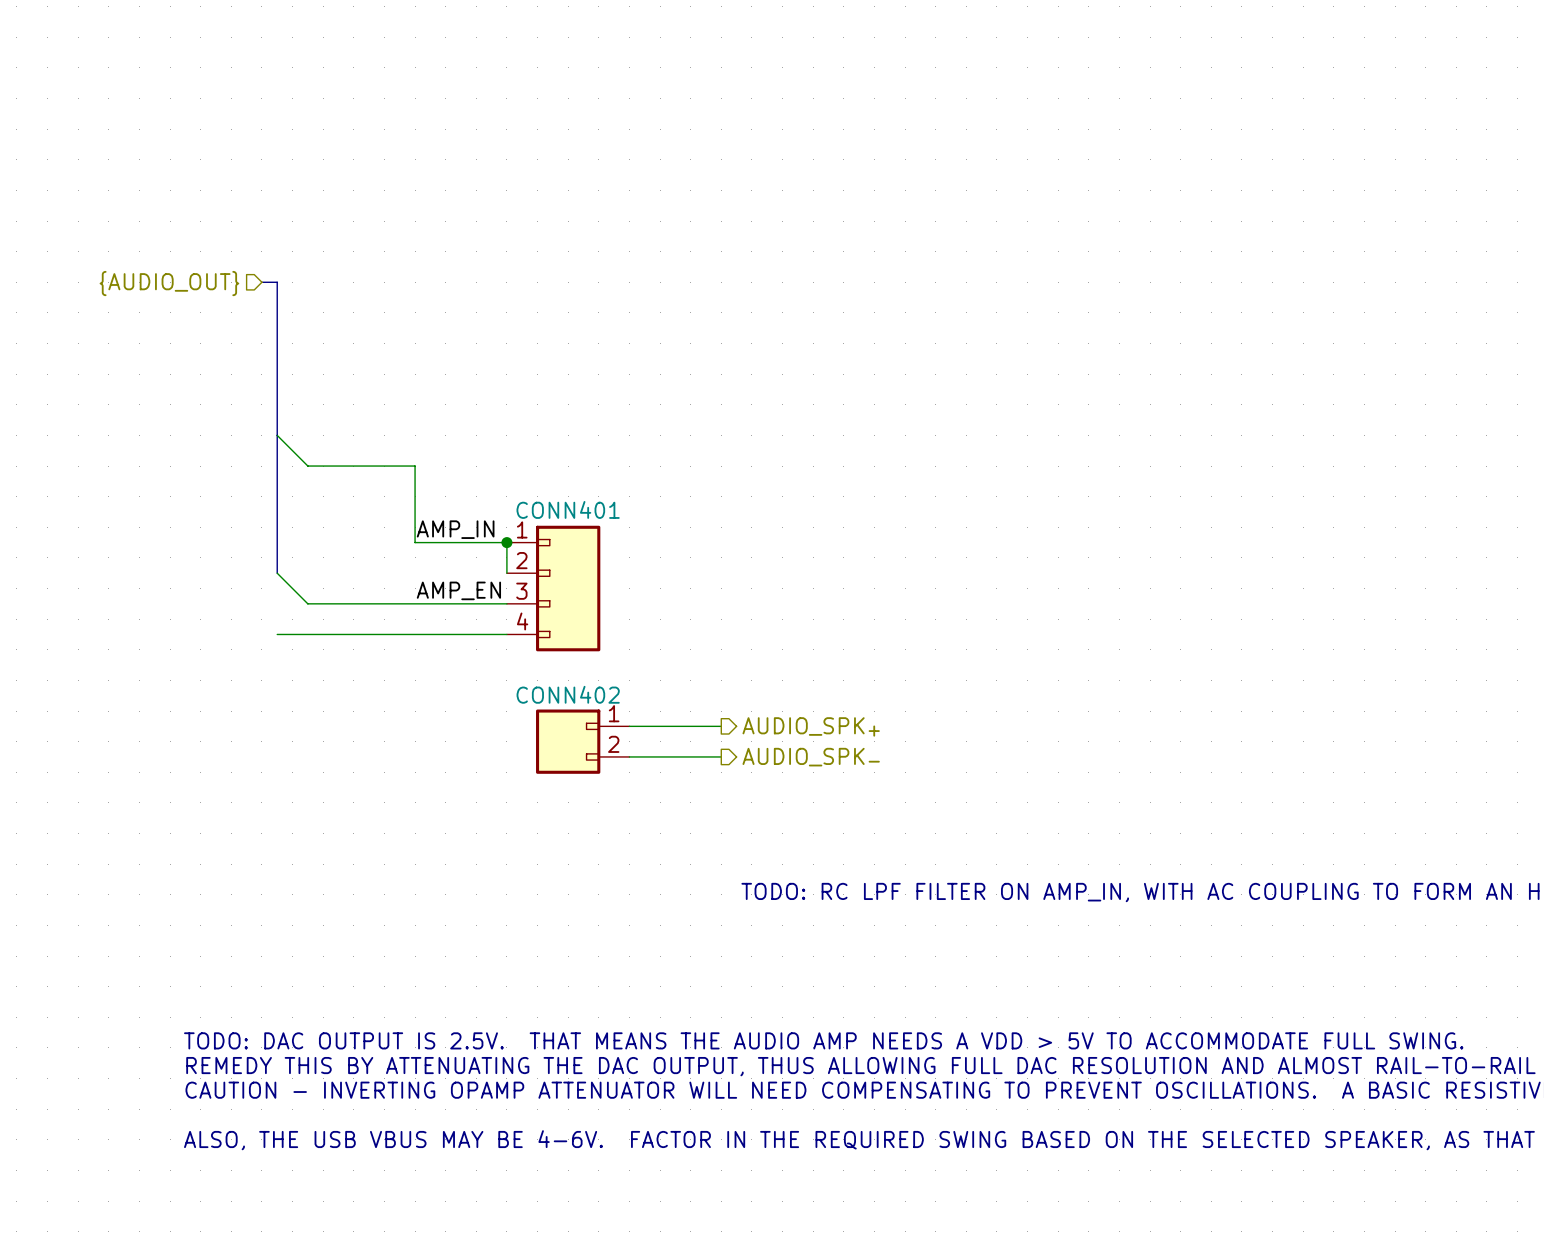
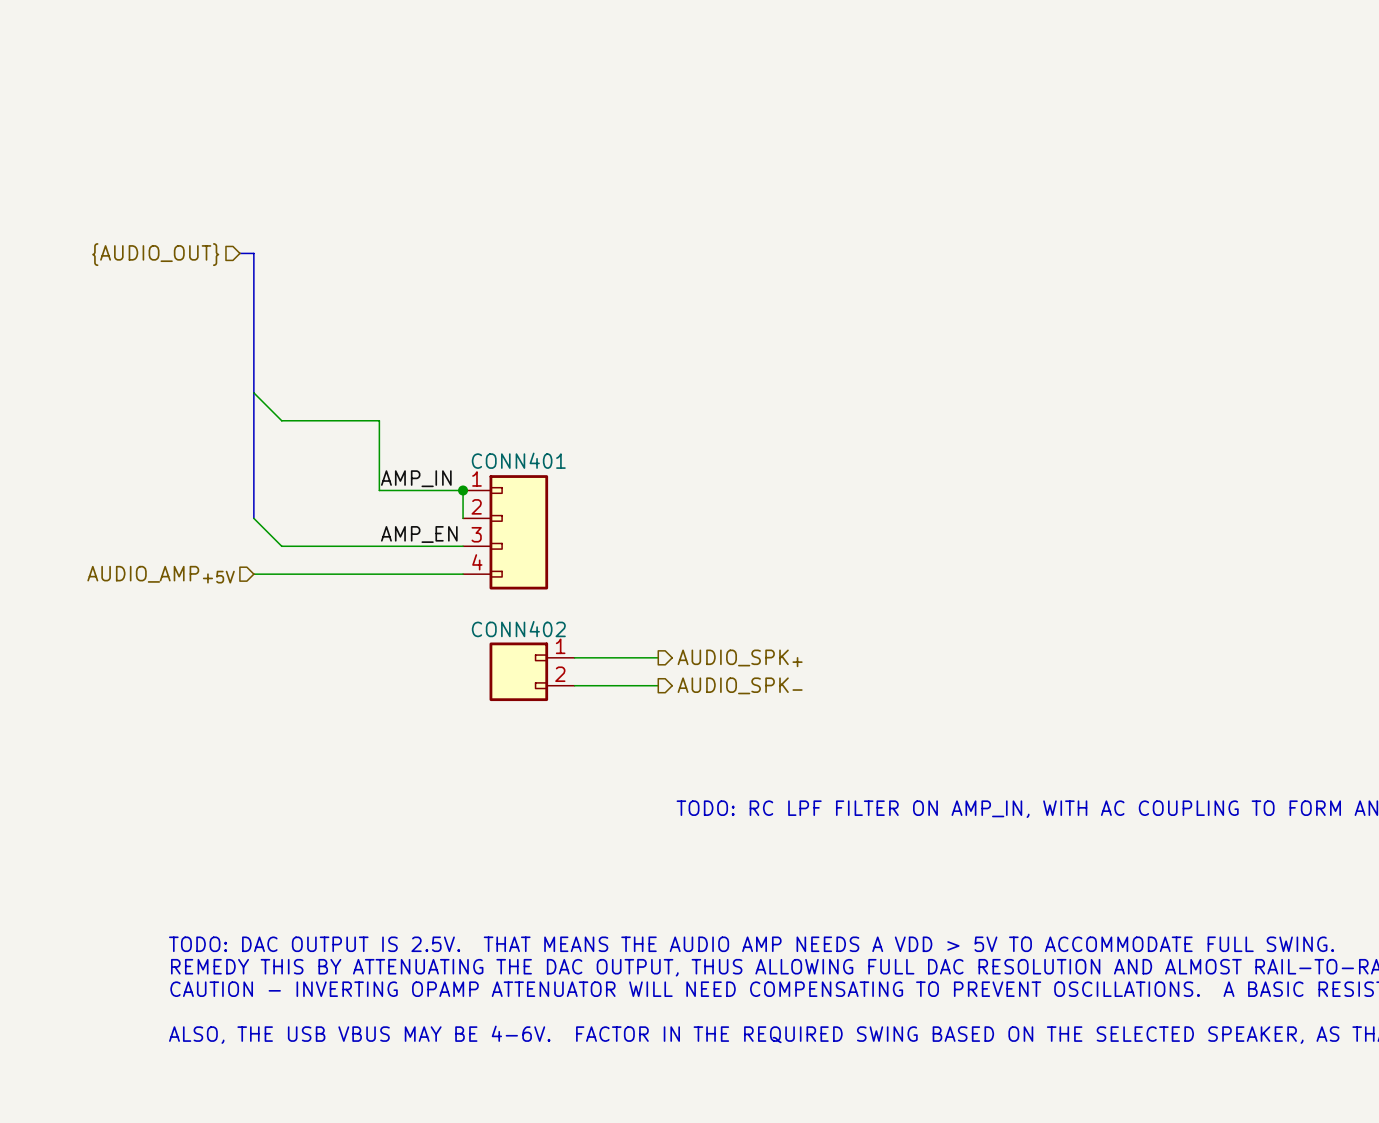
hierarchical label: none -> AUDIO_AMP+5V (161, 574)

